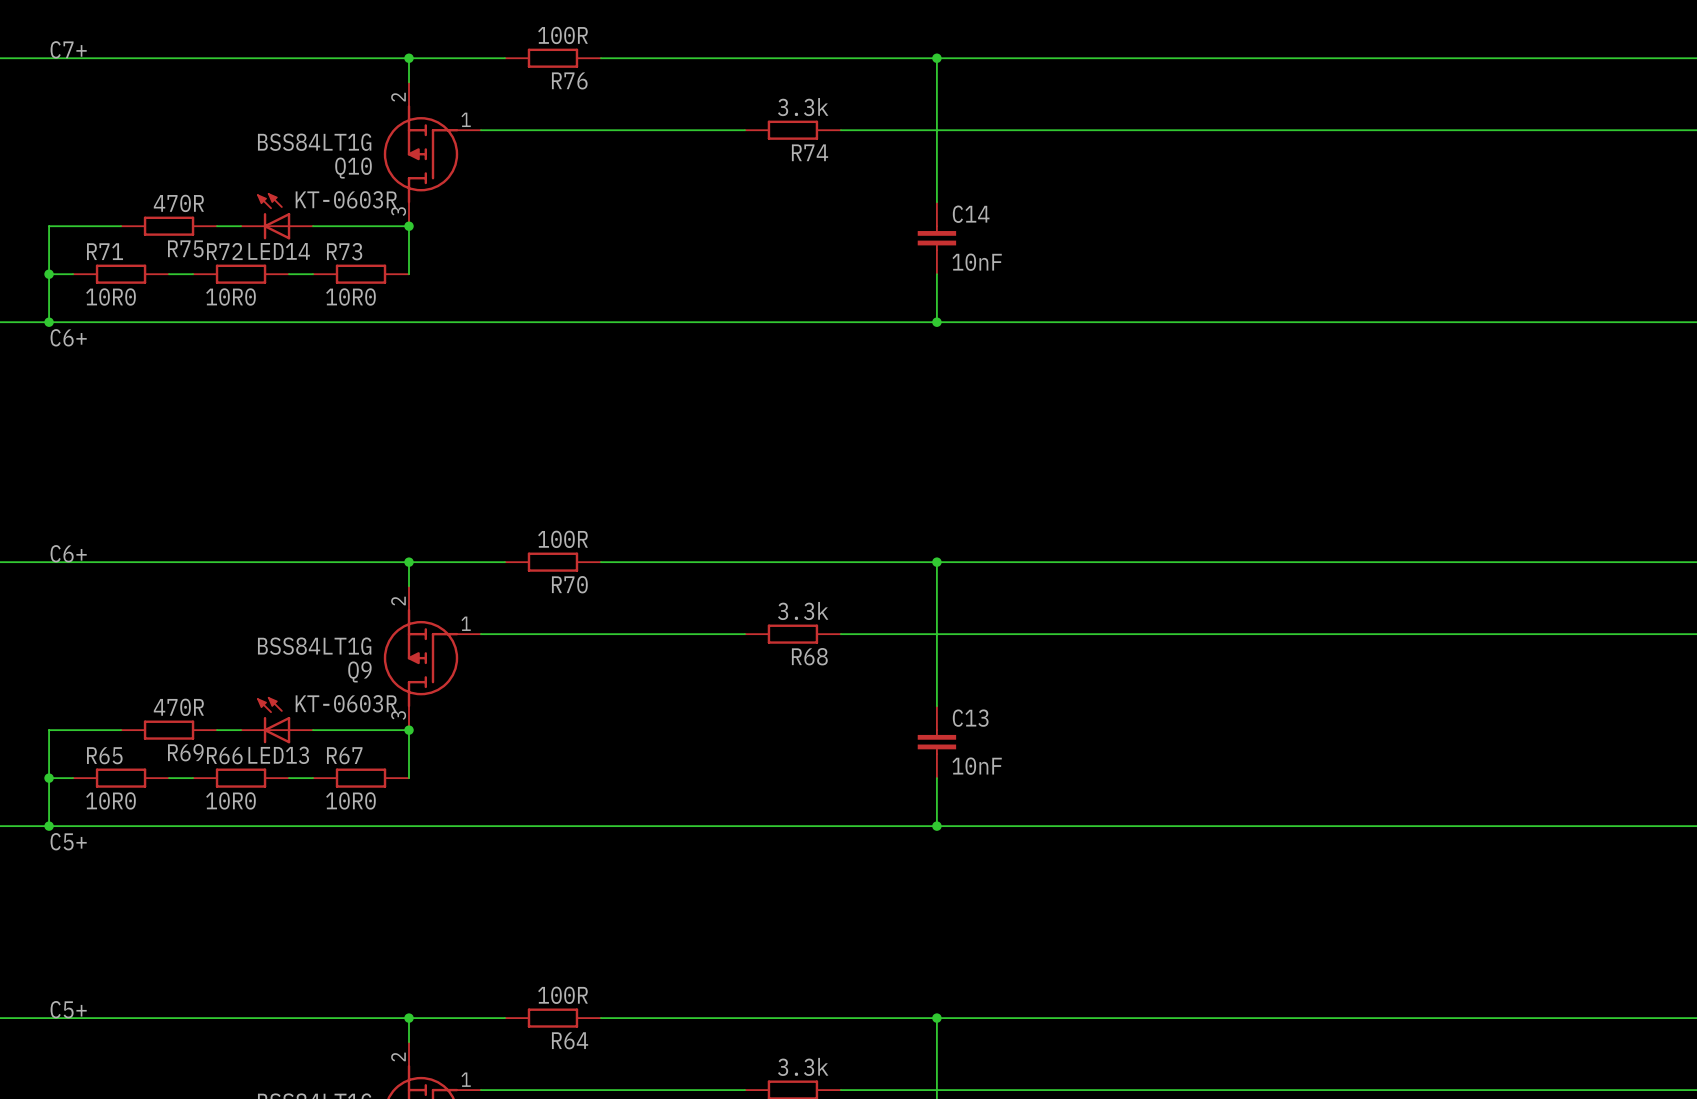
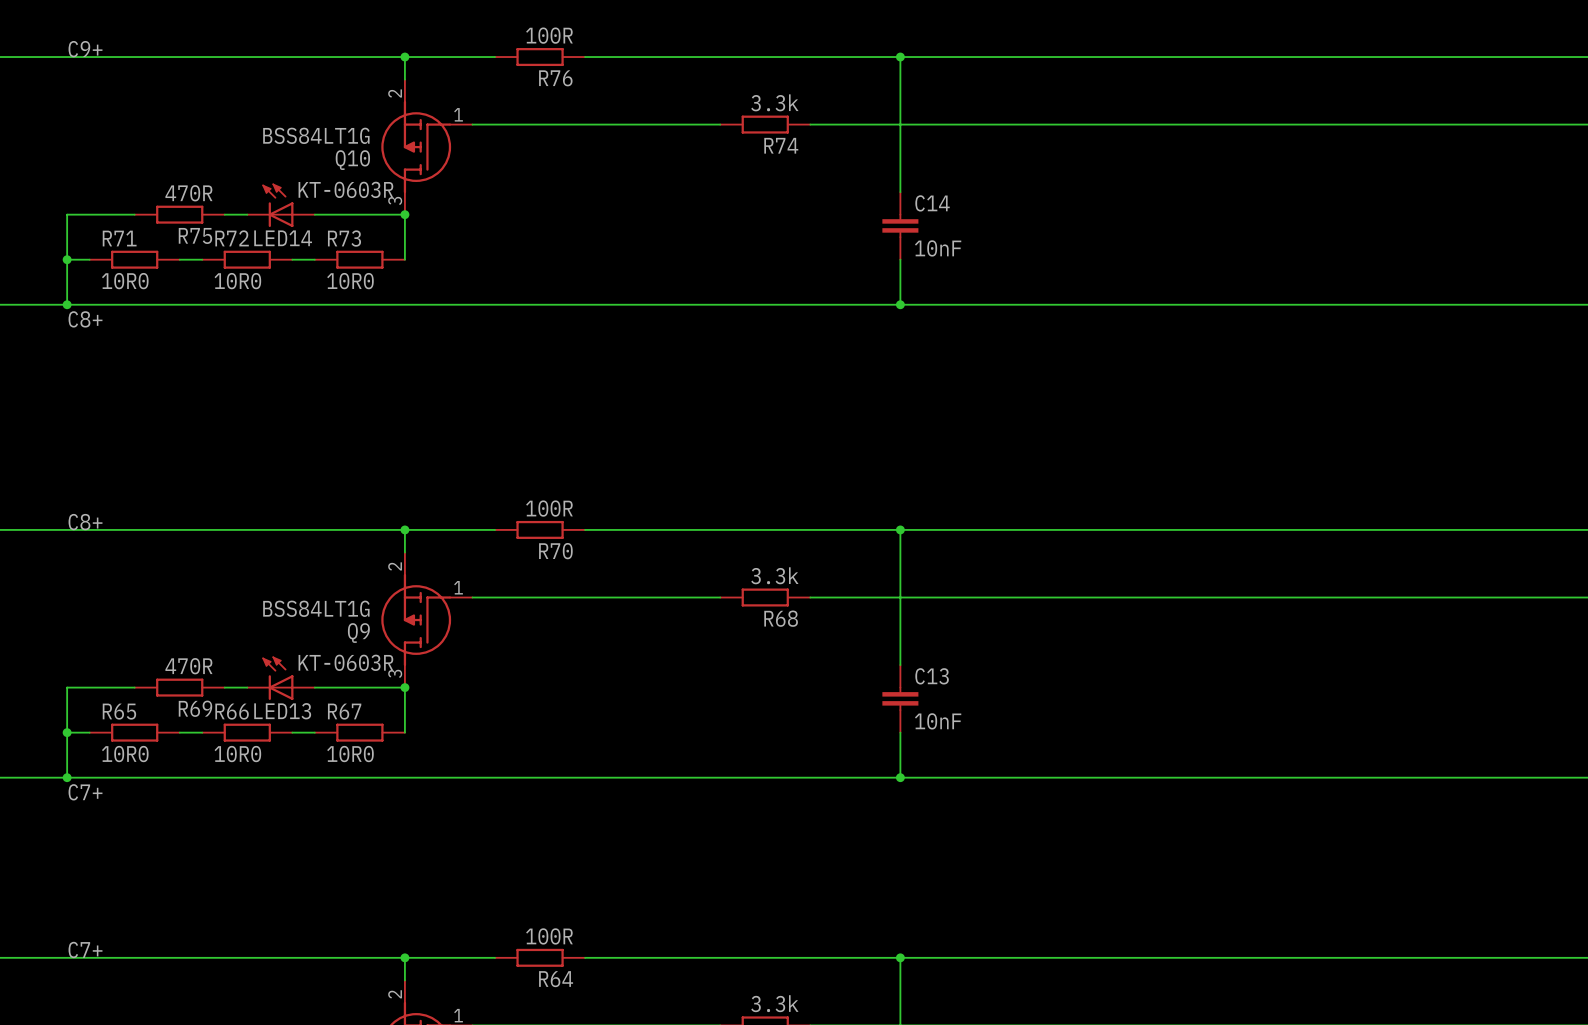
label: C7+ (68, 49) -> C9+ (85, 49)
label: C6+ (68, 337) -> C8+ (85, 319)
label: C6+ (68, 553) -> C8+ (85, 522)
label: C5+ (68, 841) -> C7+ (85, 792)
label: C5+ (68, 1009) -> C7+ (85, 949)

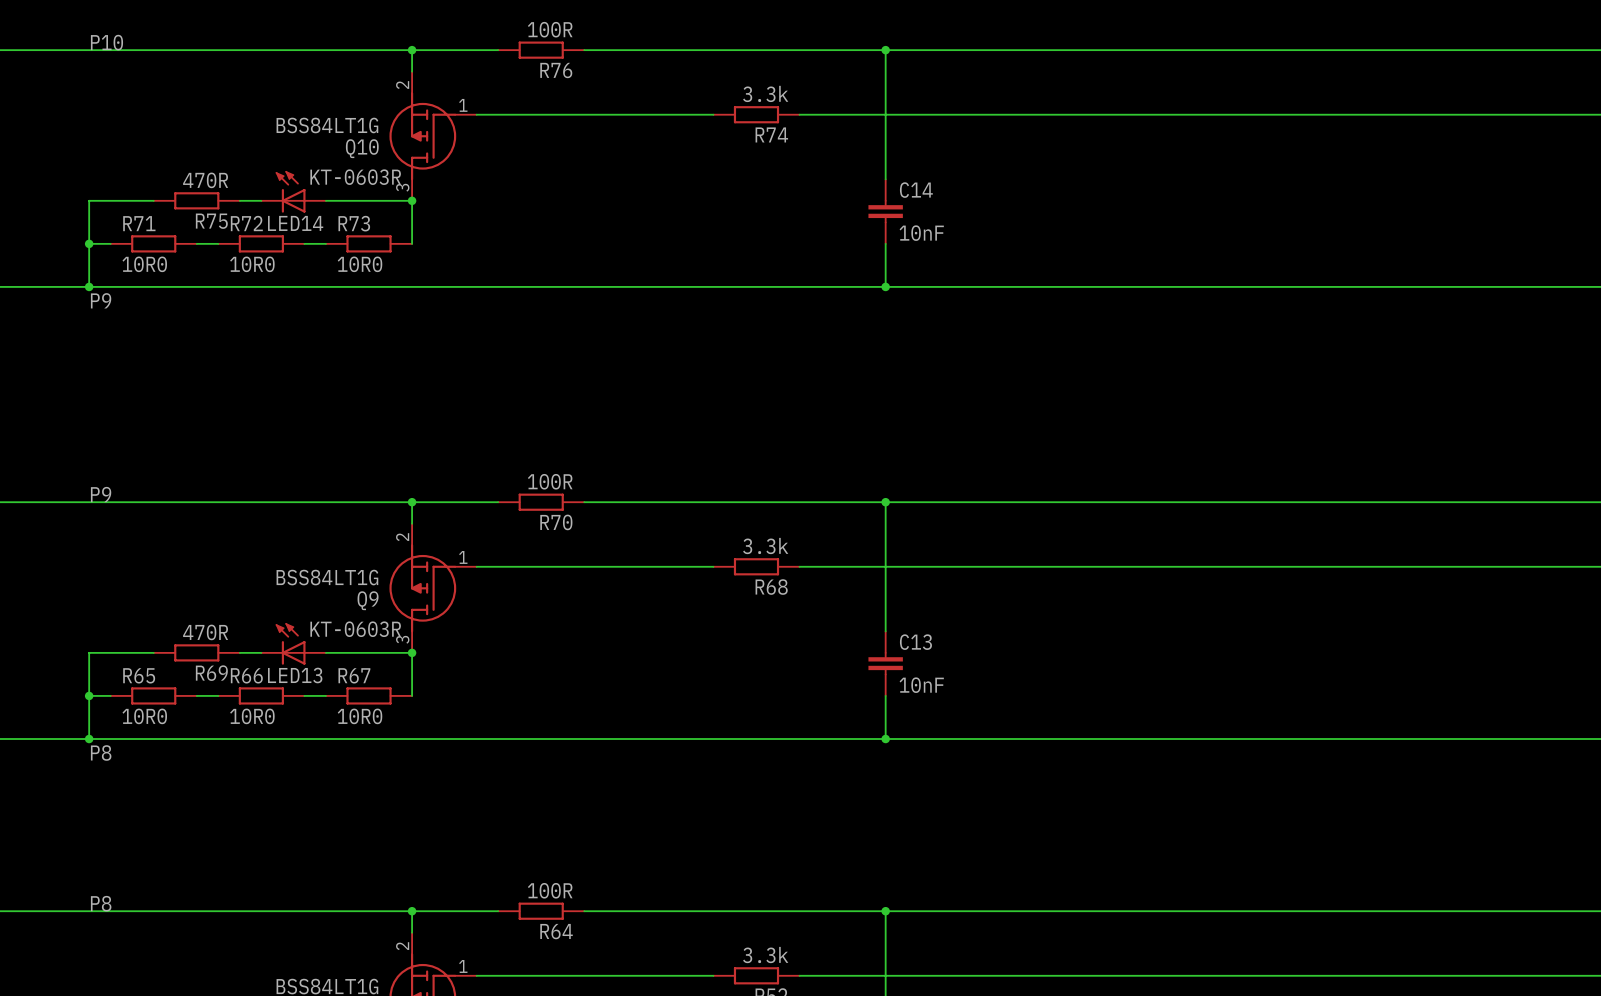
label: C9+ (85, 49) -> P10 (106, 42)
label: C8+ (85, 319) -> P9 (101, 300)
label: C8+ (85, 522) -> P9 (101, 494)
label: C7+ (85, 792) -> P8 (101, 752)
label: C7+ (85, 949) -> P8 (101, 903)

